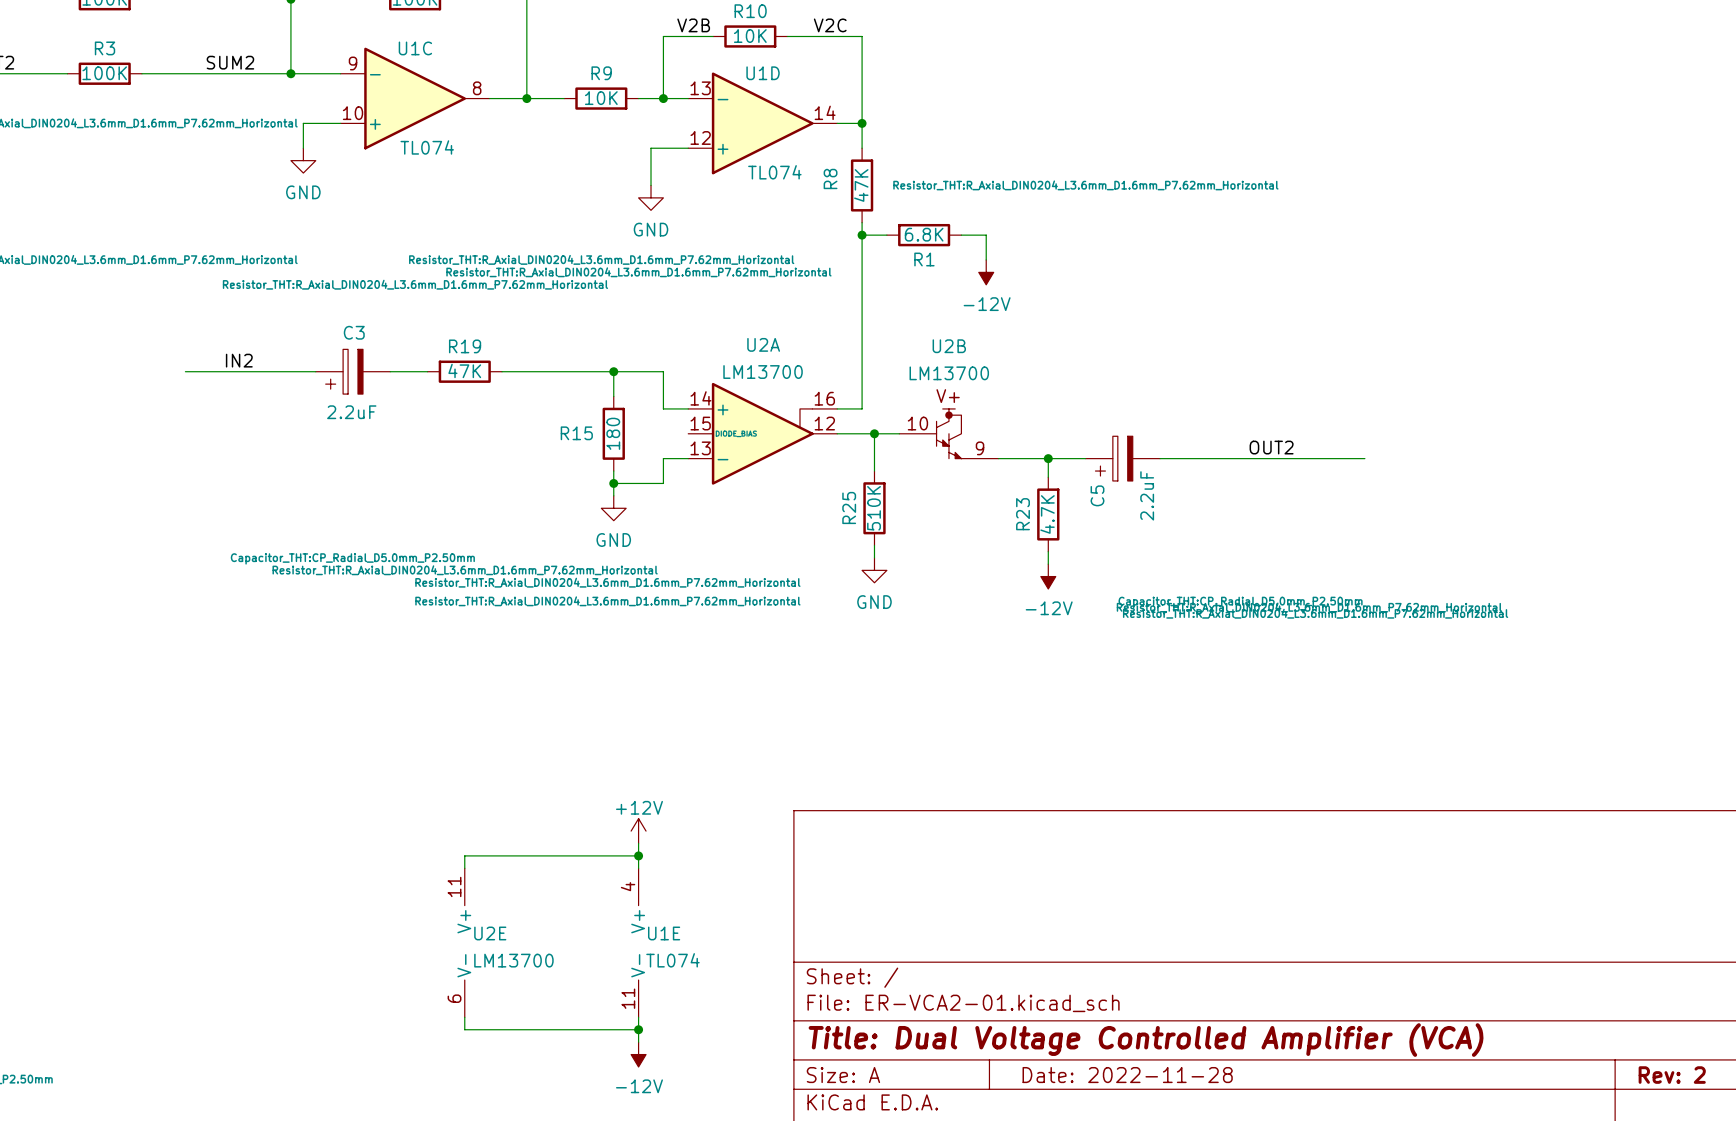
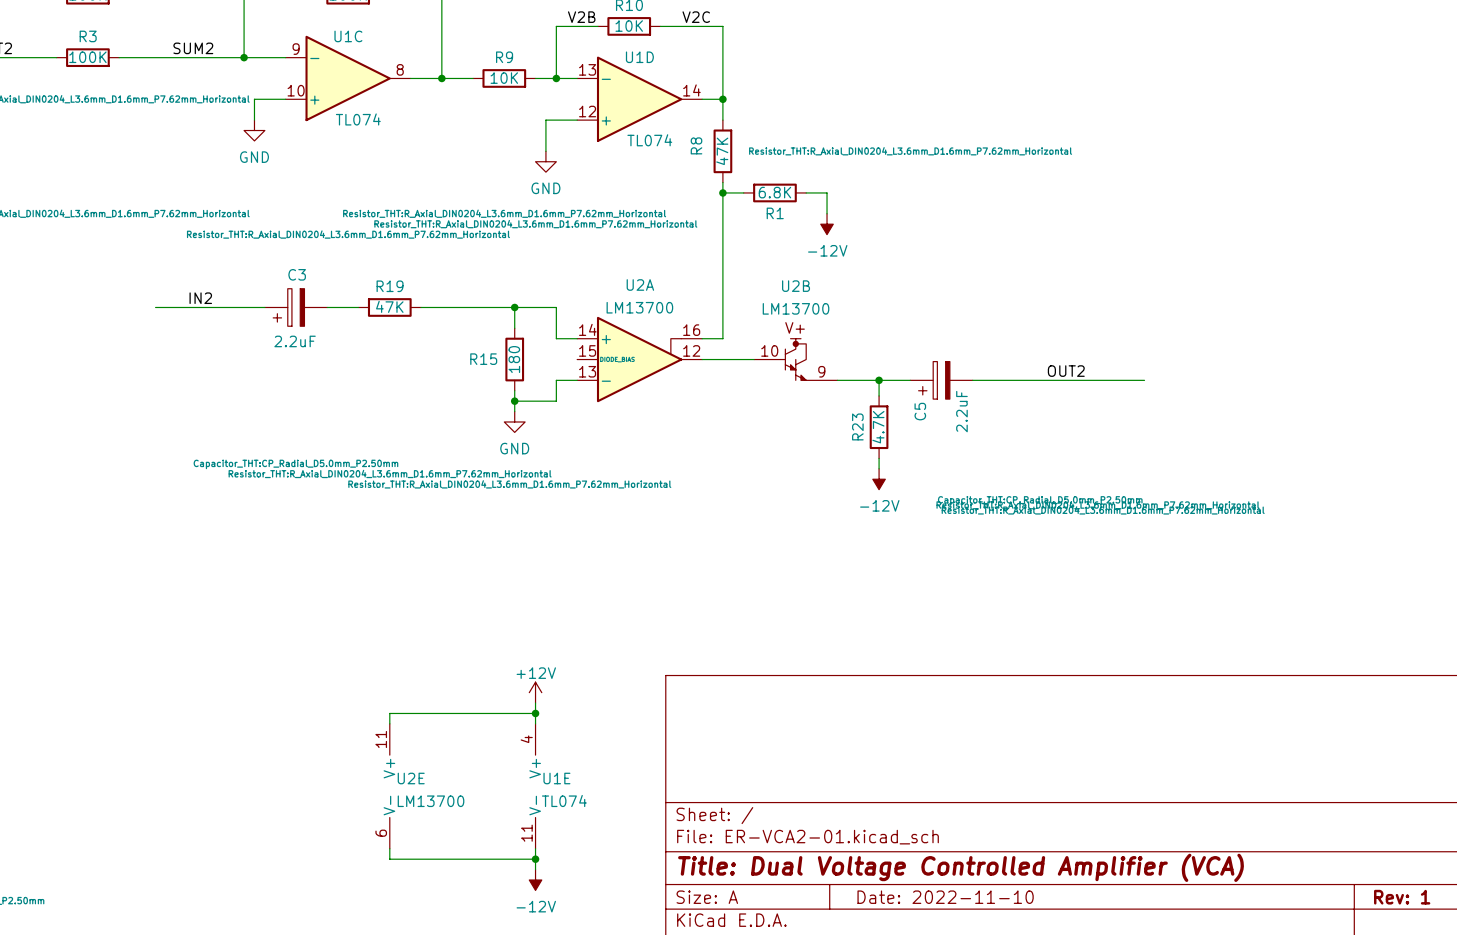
wire: (874, 433) (874, 471) -> none
junction: (874, 433) -> none
R25: 510K (874, 508) -> none
wire: (874, 545) (874, 557) -> none
power symbol: GND (874, 570) -> none
title block: Date: 2022-11-28 (1127, 1075) -> Date: 2022-11-10 (945, 897)
title block: Rev: 2 (1672, 1075) -> Rev: 1 (1402, 897)

